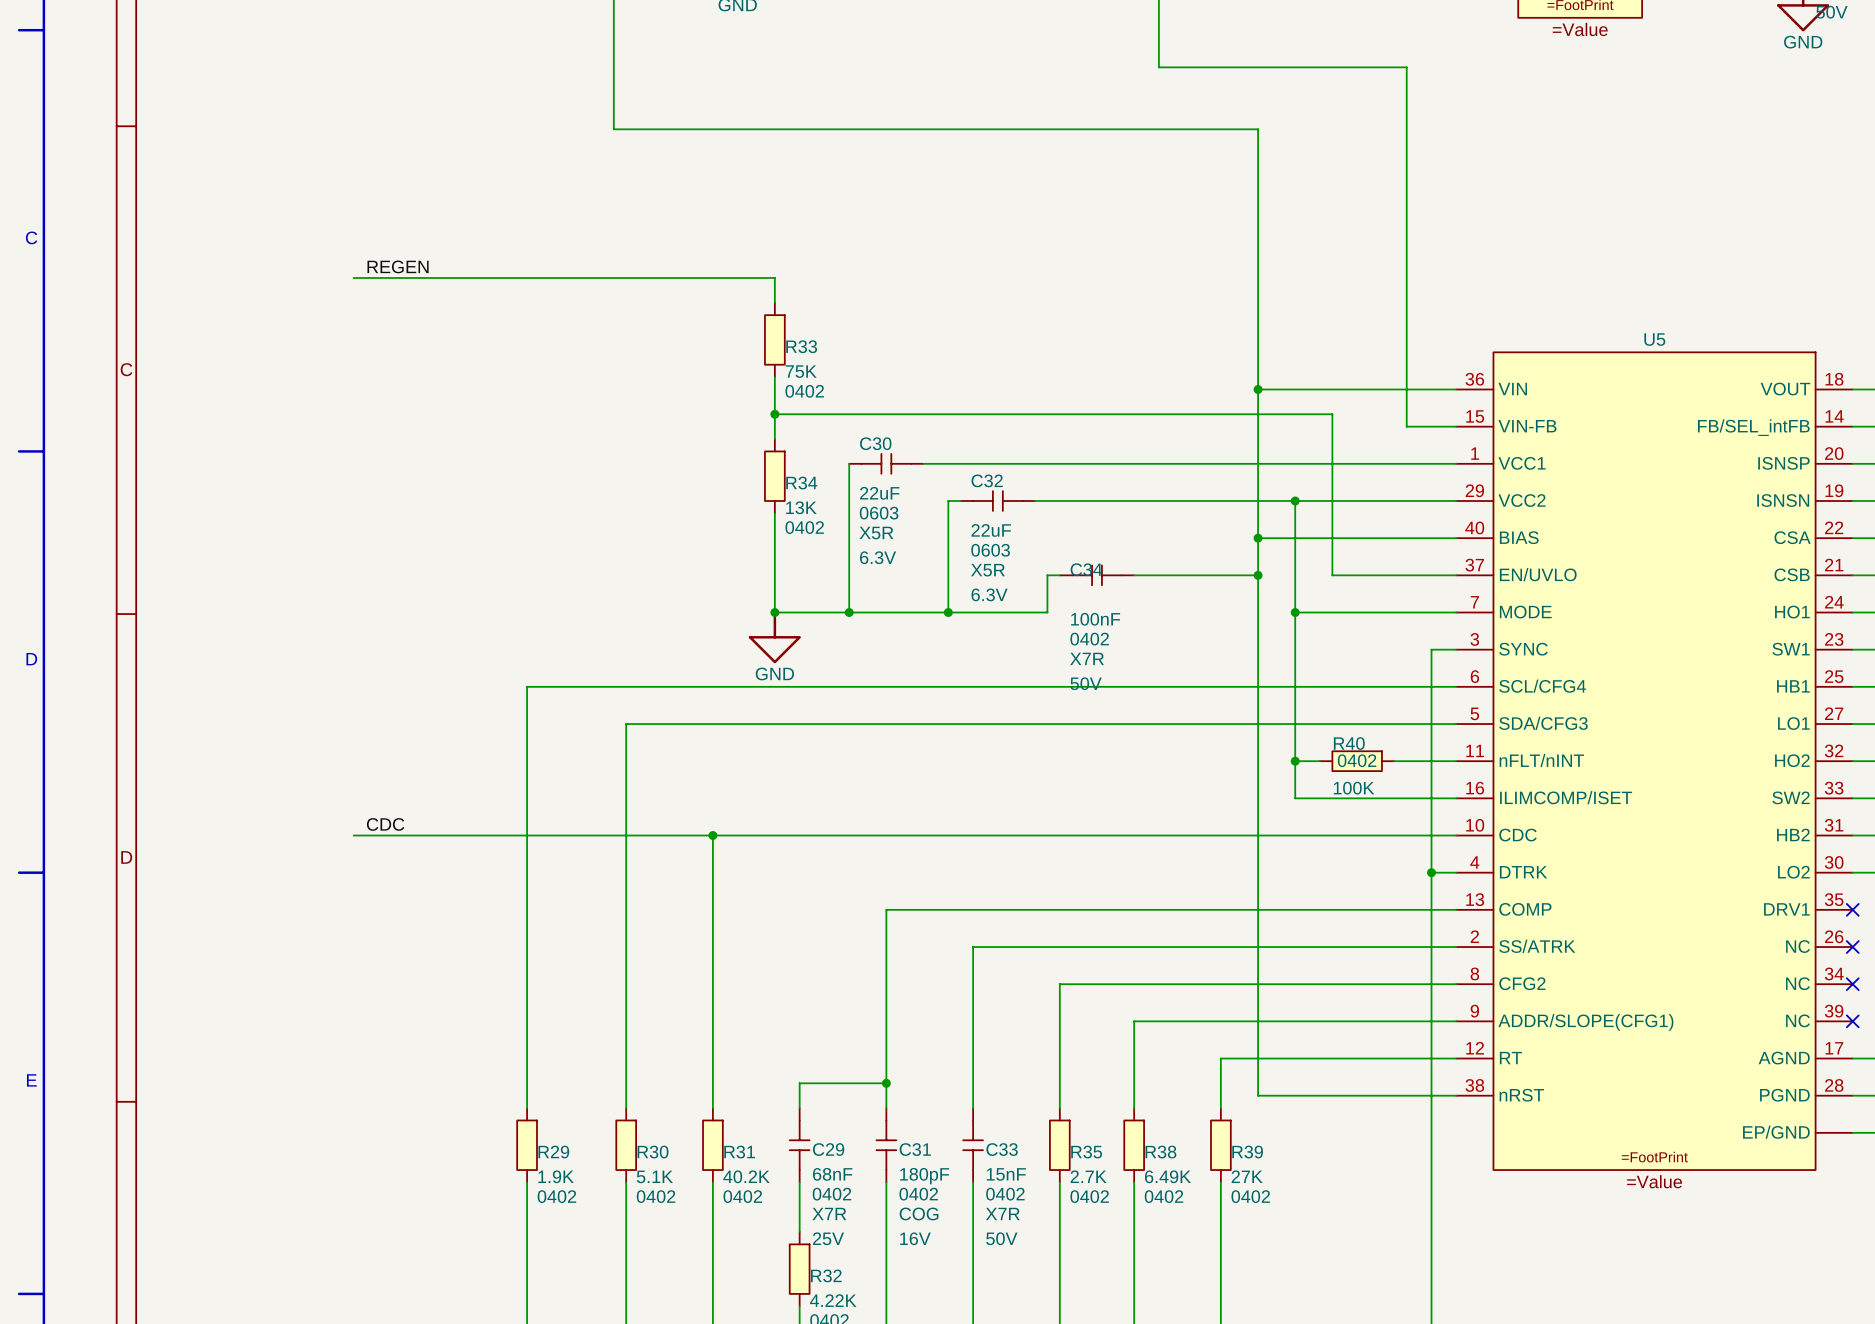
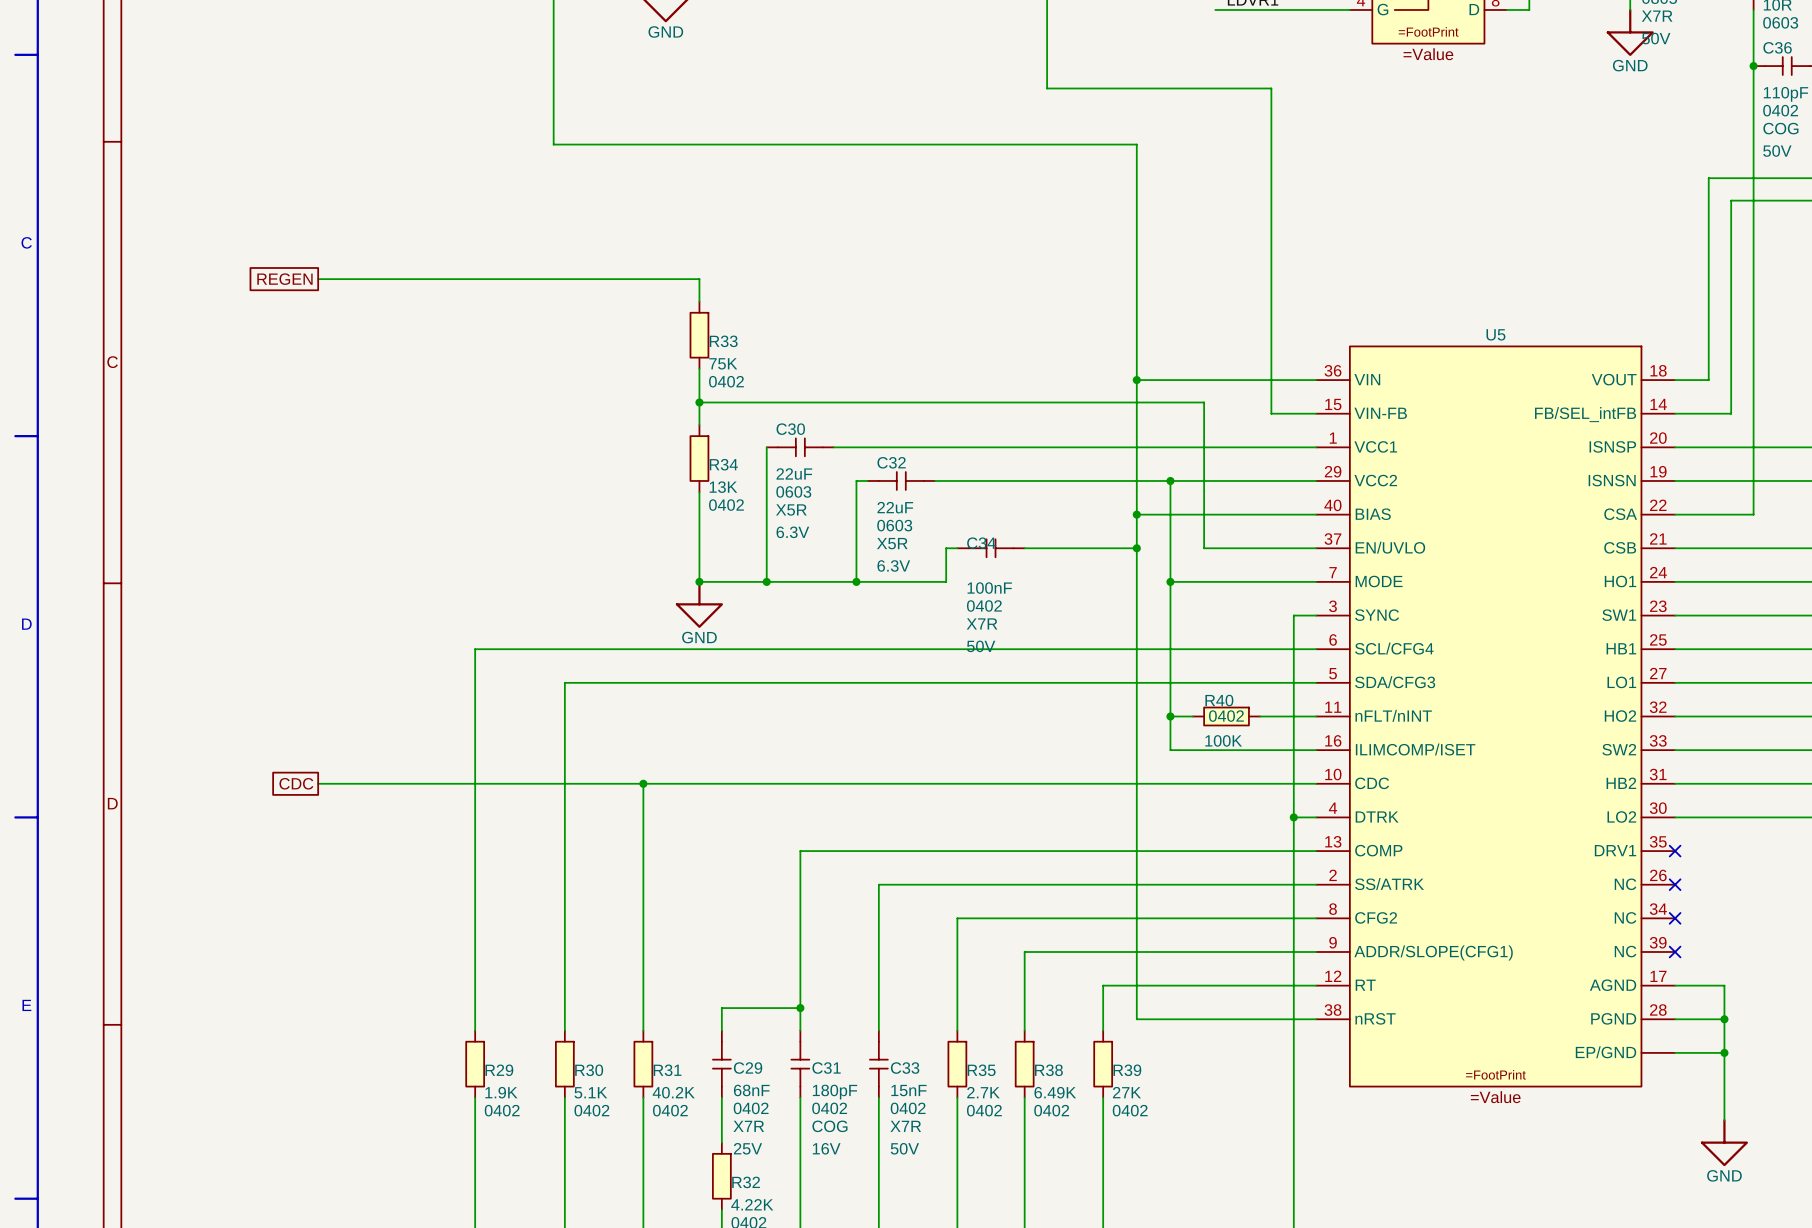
label: REGEN (398, 266) -> none
global label: none -> REGEN (284, 279)
label: CDC (385, 824) -> none
global label: none -> CDC (296, 783)

